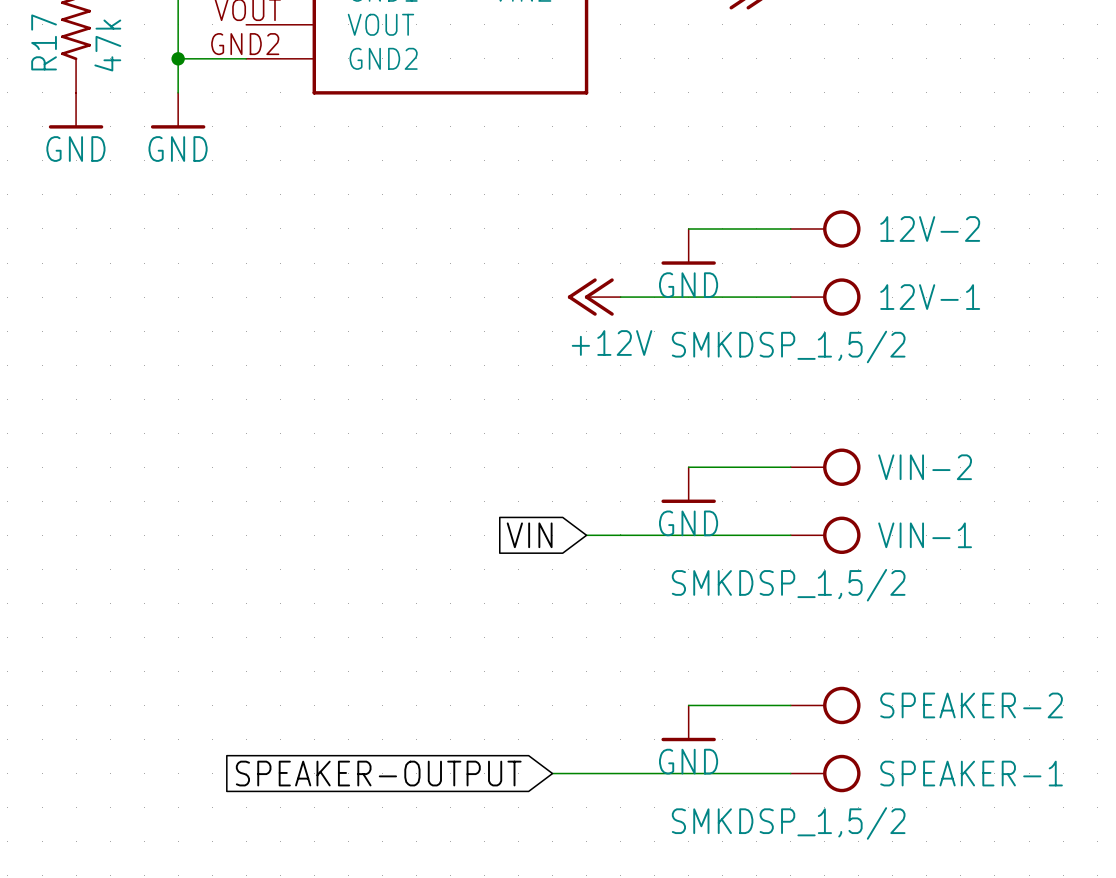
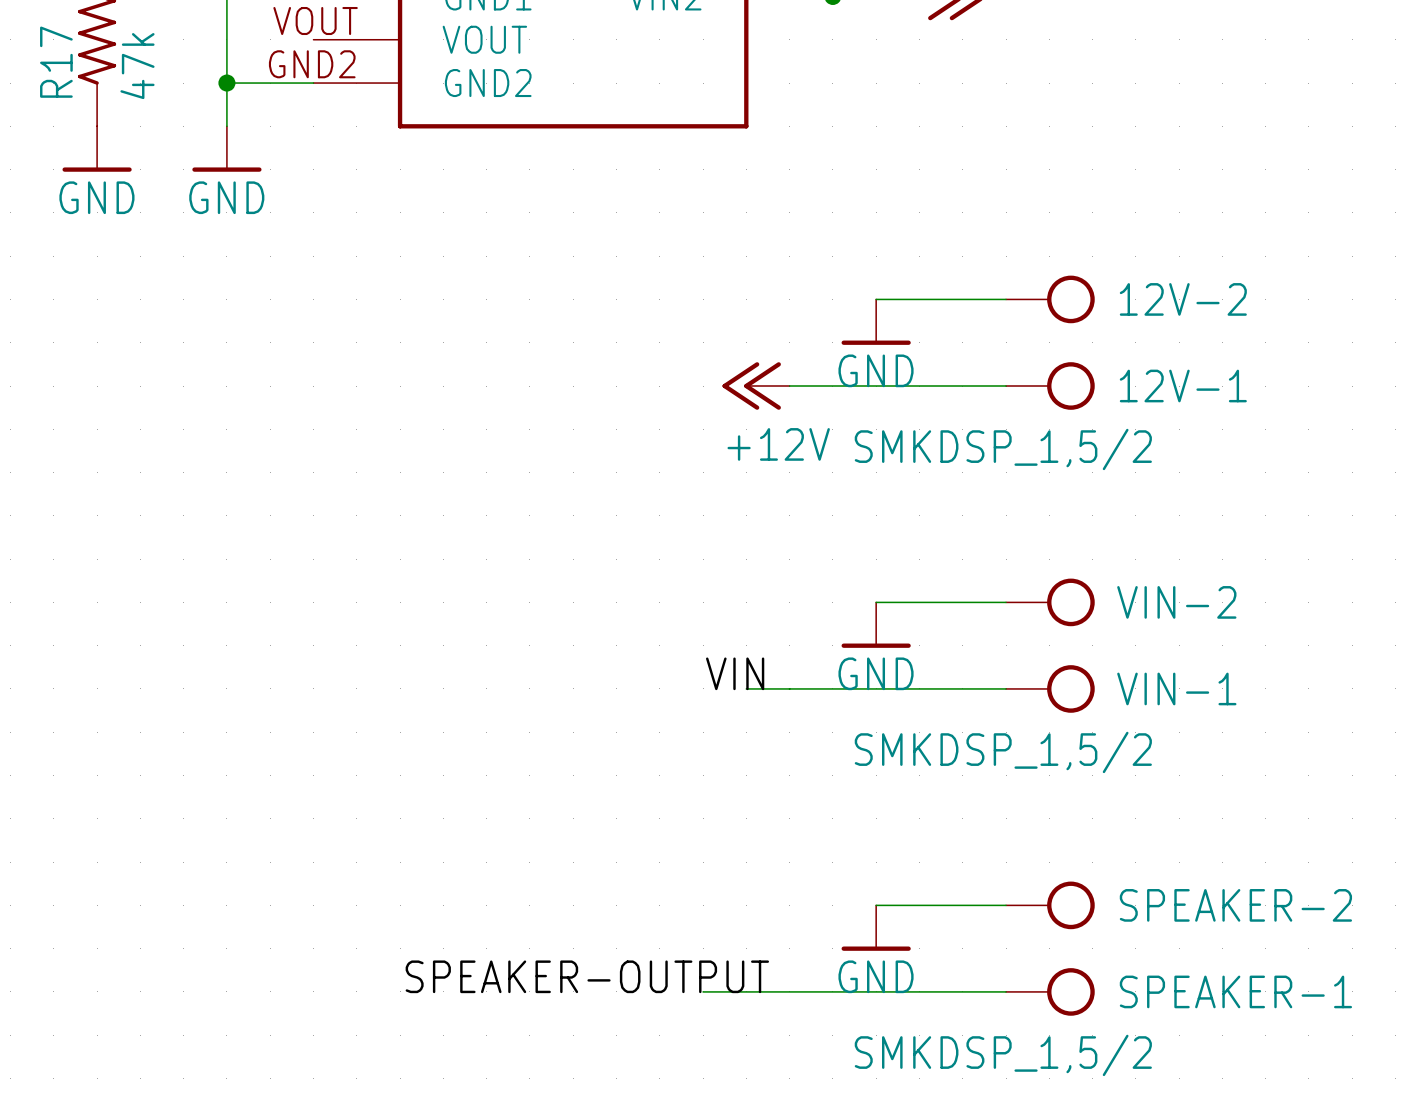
label: none -> VIN (735, 673)
global label: VIN (529, 535) -> none
label: none -> SPEAKER-OUTPUT (587, 976)
global label: SPEAKER-OUTPUT (378, 773) -> none

